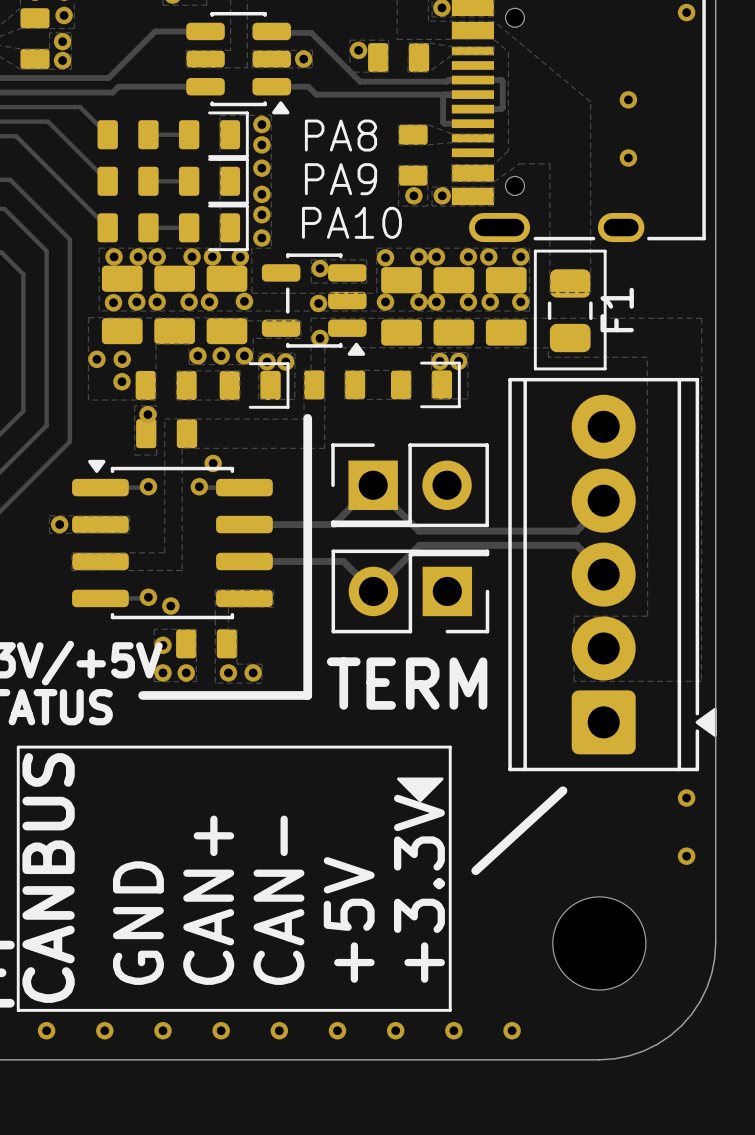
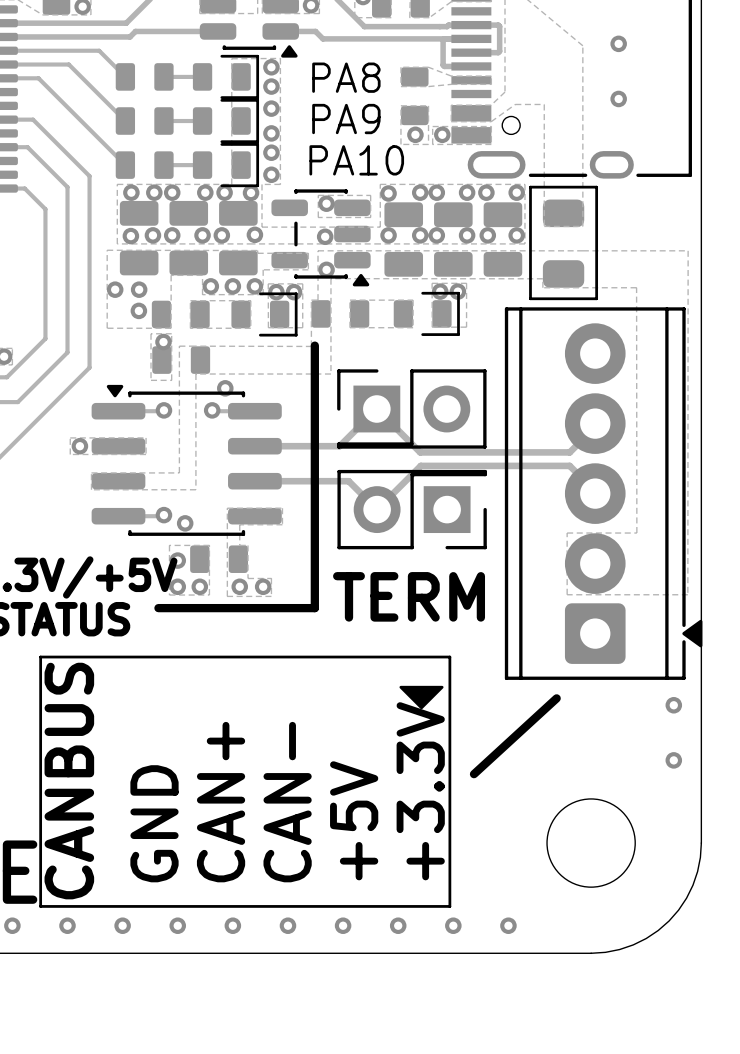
F1: (570, 310) -> none
part: none -> (563, 243)

